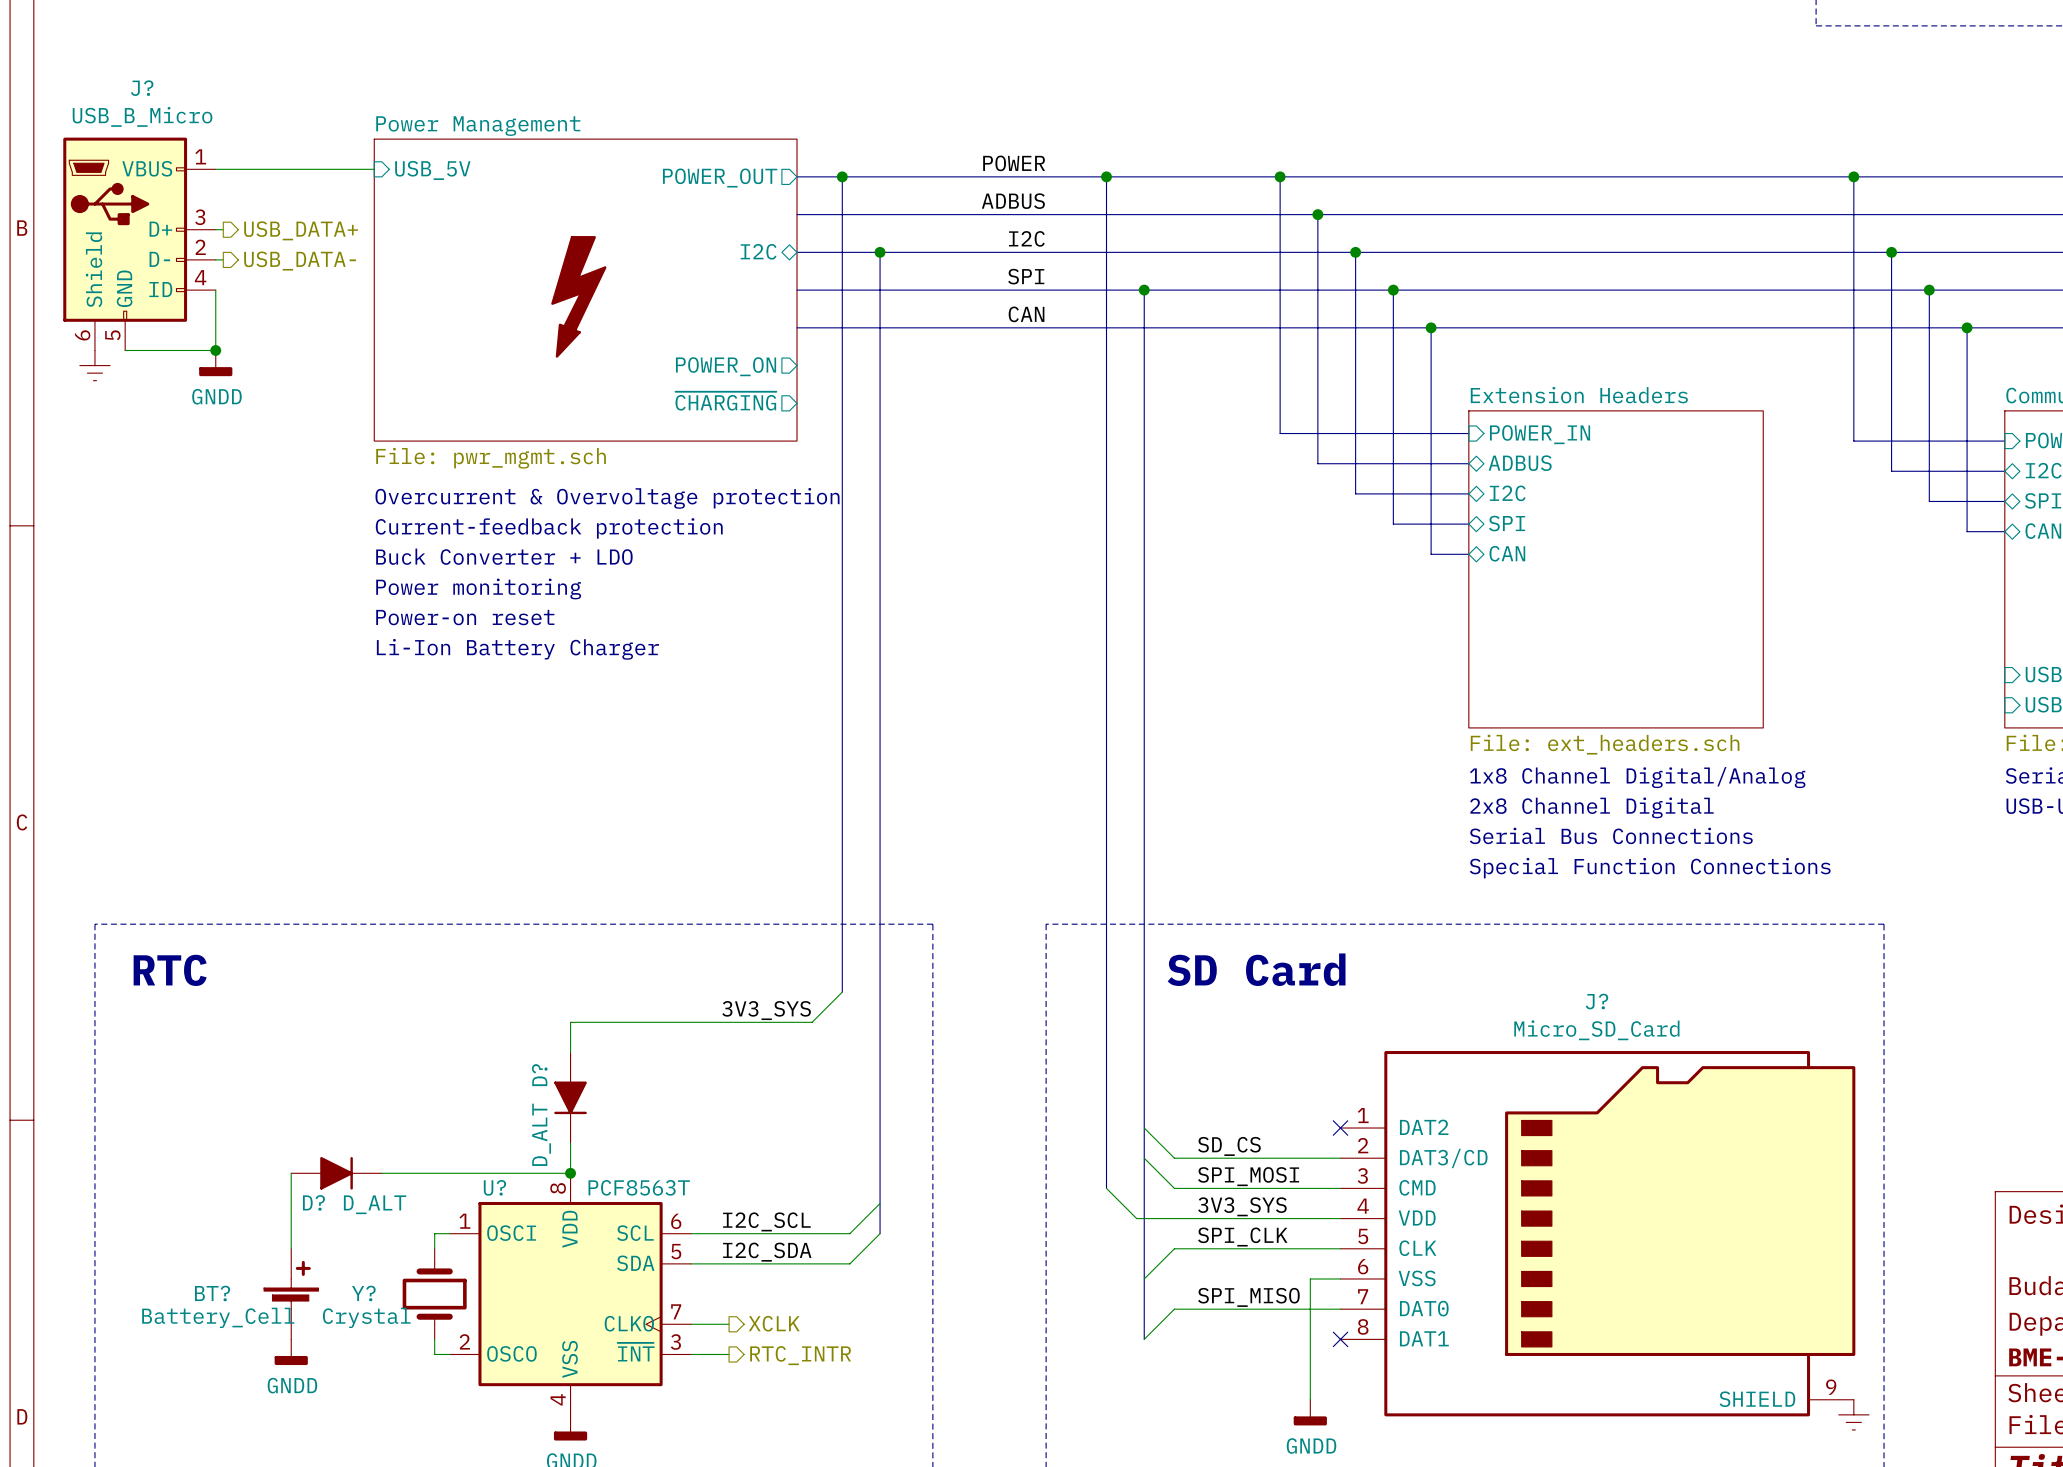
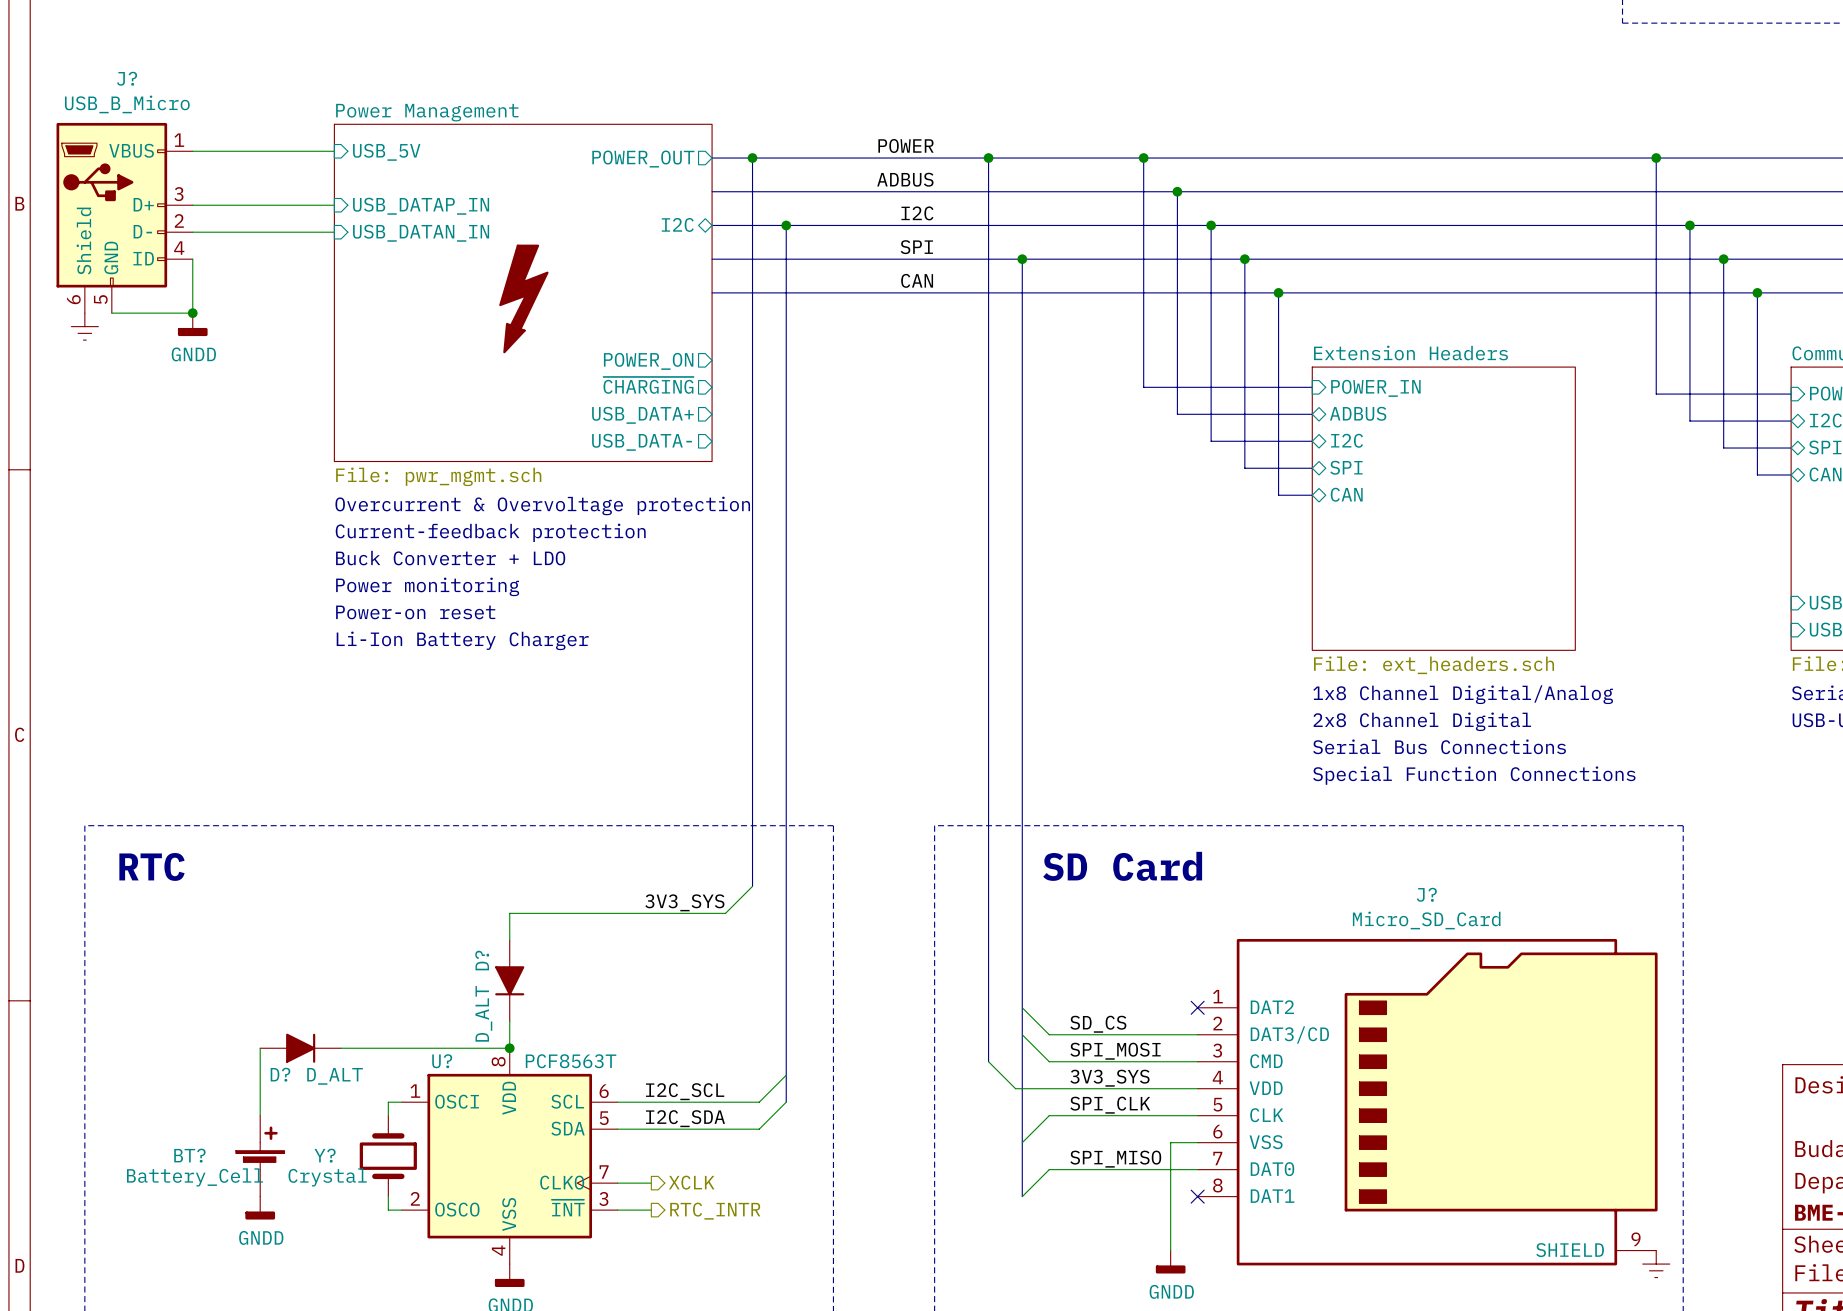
wire: none -> (199, 205) (334, 205)
hierarchical label: USB_DATA+ (301, 230) -> none
sheet pin: none -> USB_DATAP_IN (421, 206)
wire: none -> (199, 232) (334, 232)
hierarchical label: USB_DATA- (300, 261) -> none
sheet pin: none -> USB_DATAN_IN (421, 233)
sheet Power Management: File: pwr_mgmt.sch (585, 290) -> none
power symbol position: (578, 296) -> (523, 298)
sheet Power Management: none -> File: pwr_mgmt.sch (523, 292)
sheet pin: POWER_ON (726, 366) -> none
sheet pin: ~{CHARGING} (725, 401) -> POWER_ON (648, 361)
sheet pin: none -> ~{CHARGING} (648, 385)
sheet pin: none -> USB_DATA+ (642, 415)
sheet pin: none -> USB_DATA- (642, 442)
text position: Overcurrent & Overvoltage protection (607, 498) -> Overcurrent & Overvoltage protection (542, 505)
text position: Current-feedback protection (549, 528) -> Current-feedback protection (490, 532)
text position: Buck Converter + LDO (504, 556) -> Buck Converter + LDO (450, 558)
text position: Power monitoring (478, 588) -> Power monitoring (427, 586)
text position: Power-on reset (465, 617) -> Power-on reset (415, 612)
text position: Li-Ion Battery Charger (517, 649) -> Li-Ion Battery Charger (462, 640)

